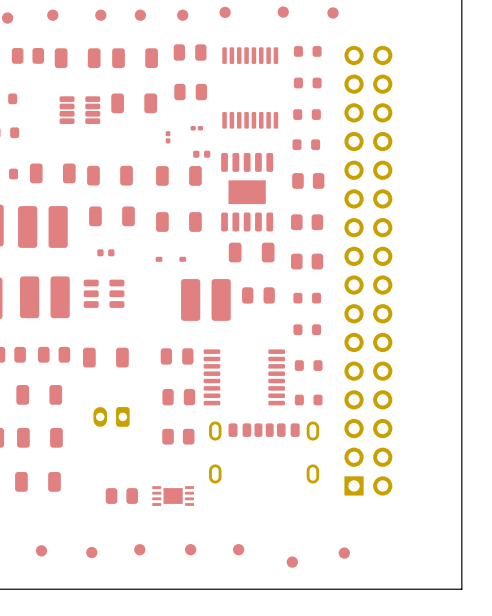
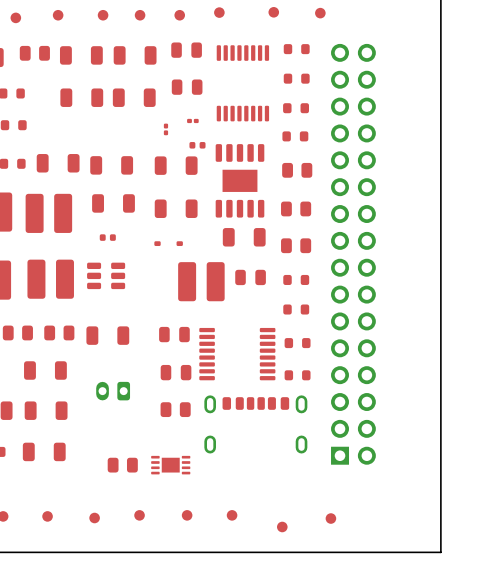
part footprint: [59, 96, 101, 124] -> [60, 88, 104, 107]

